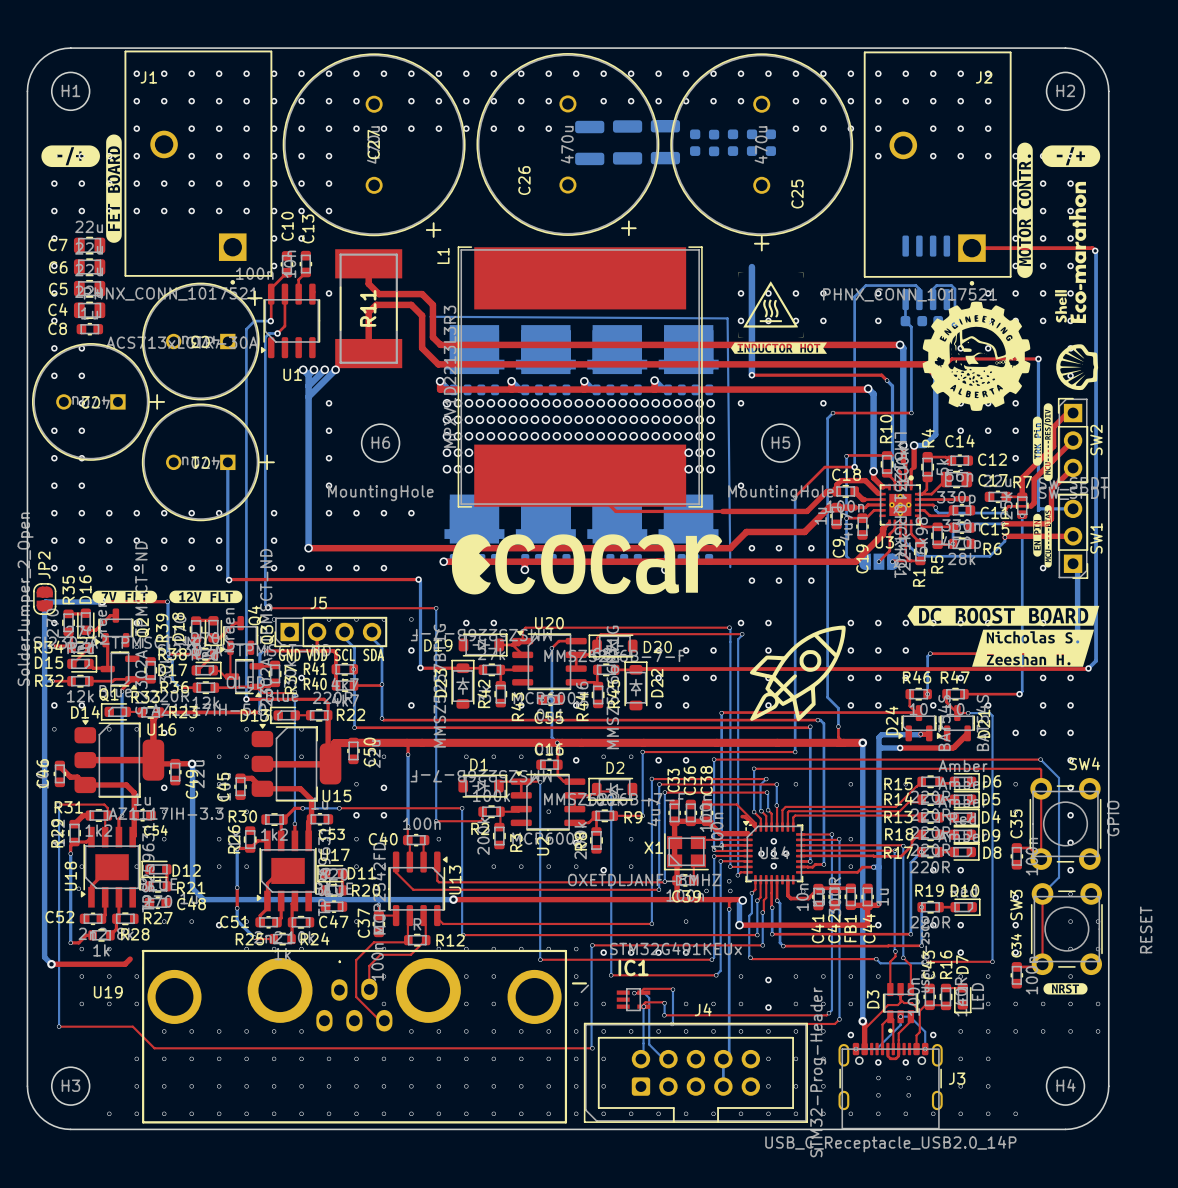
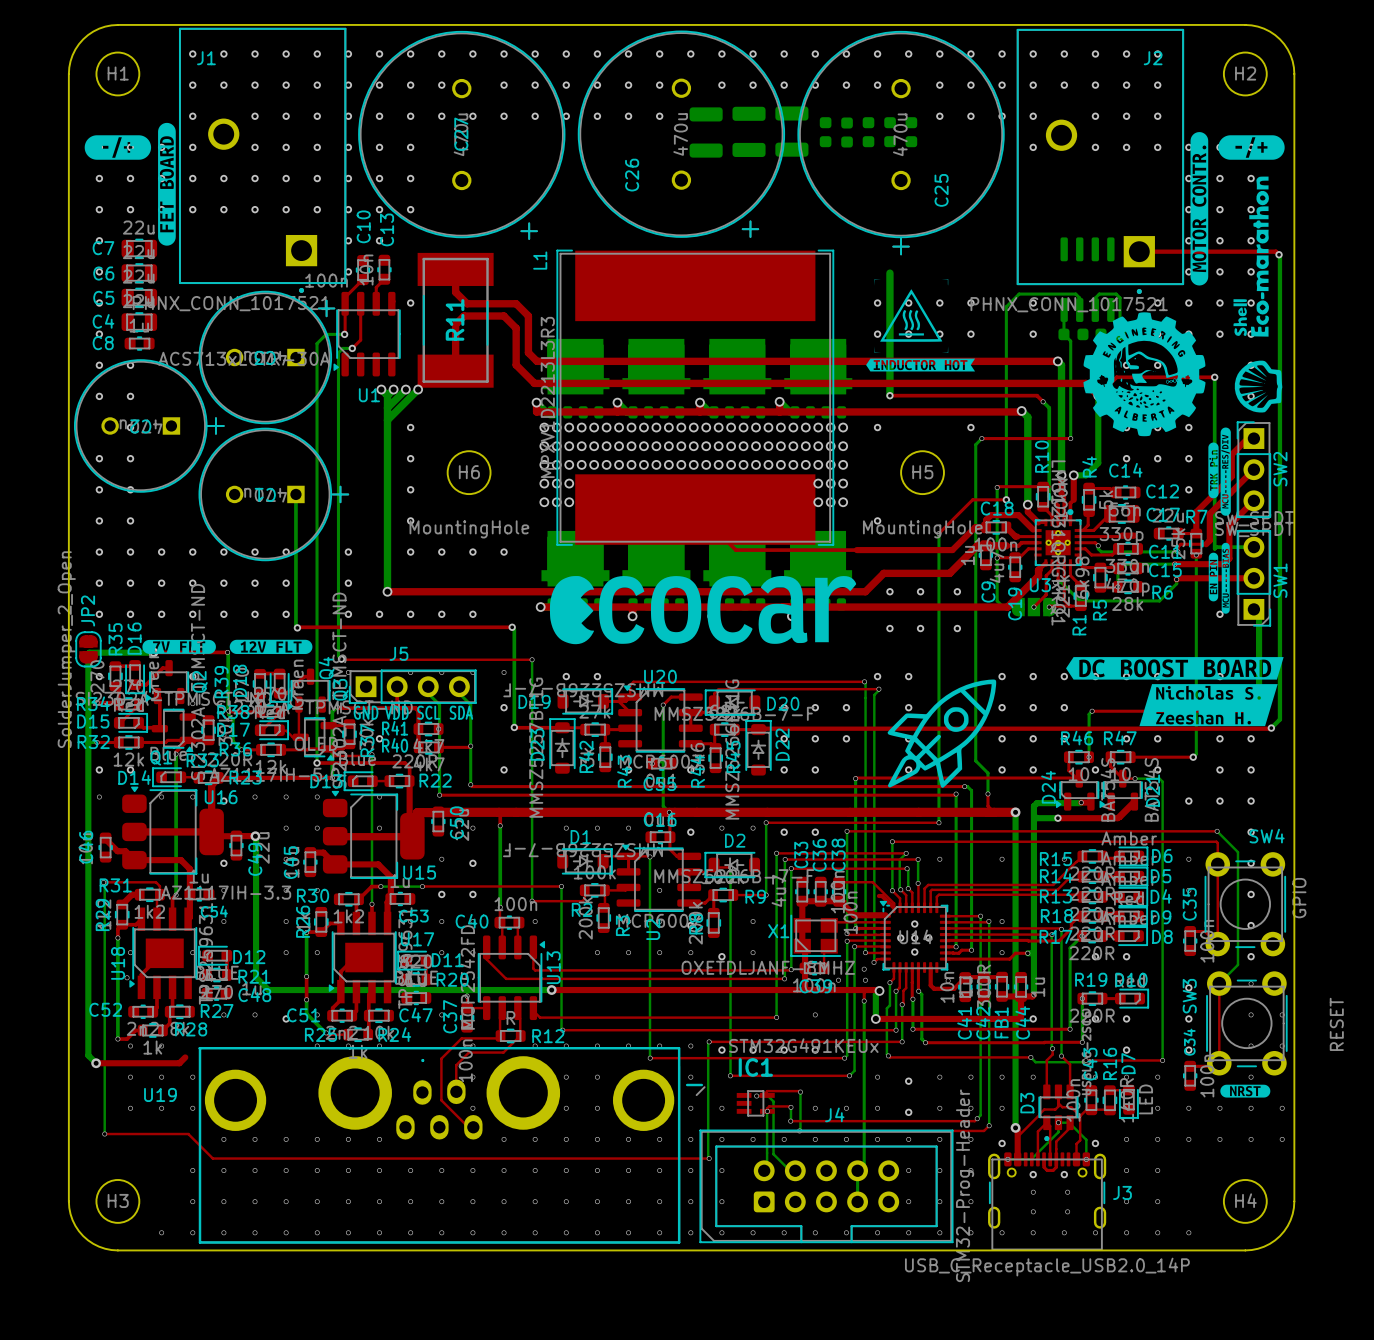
bottom track: (430, 316) (727, 318) (730, 567) -> none

